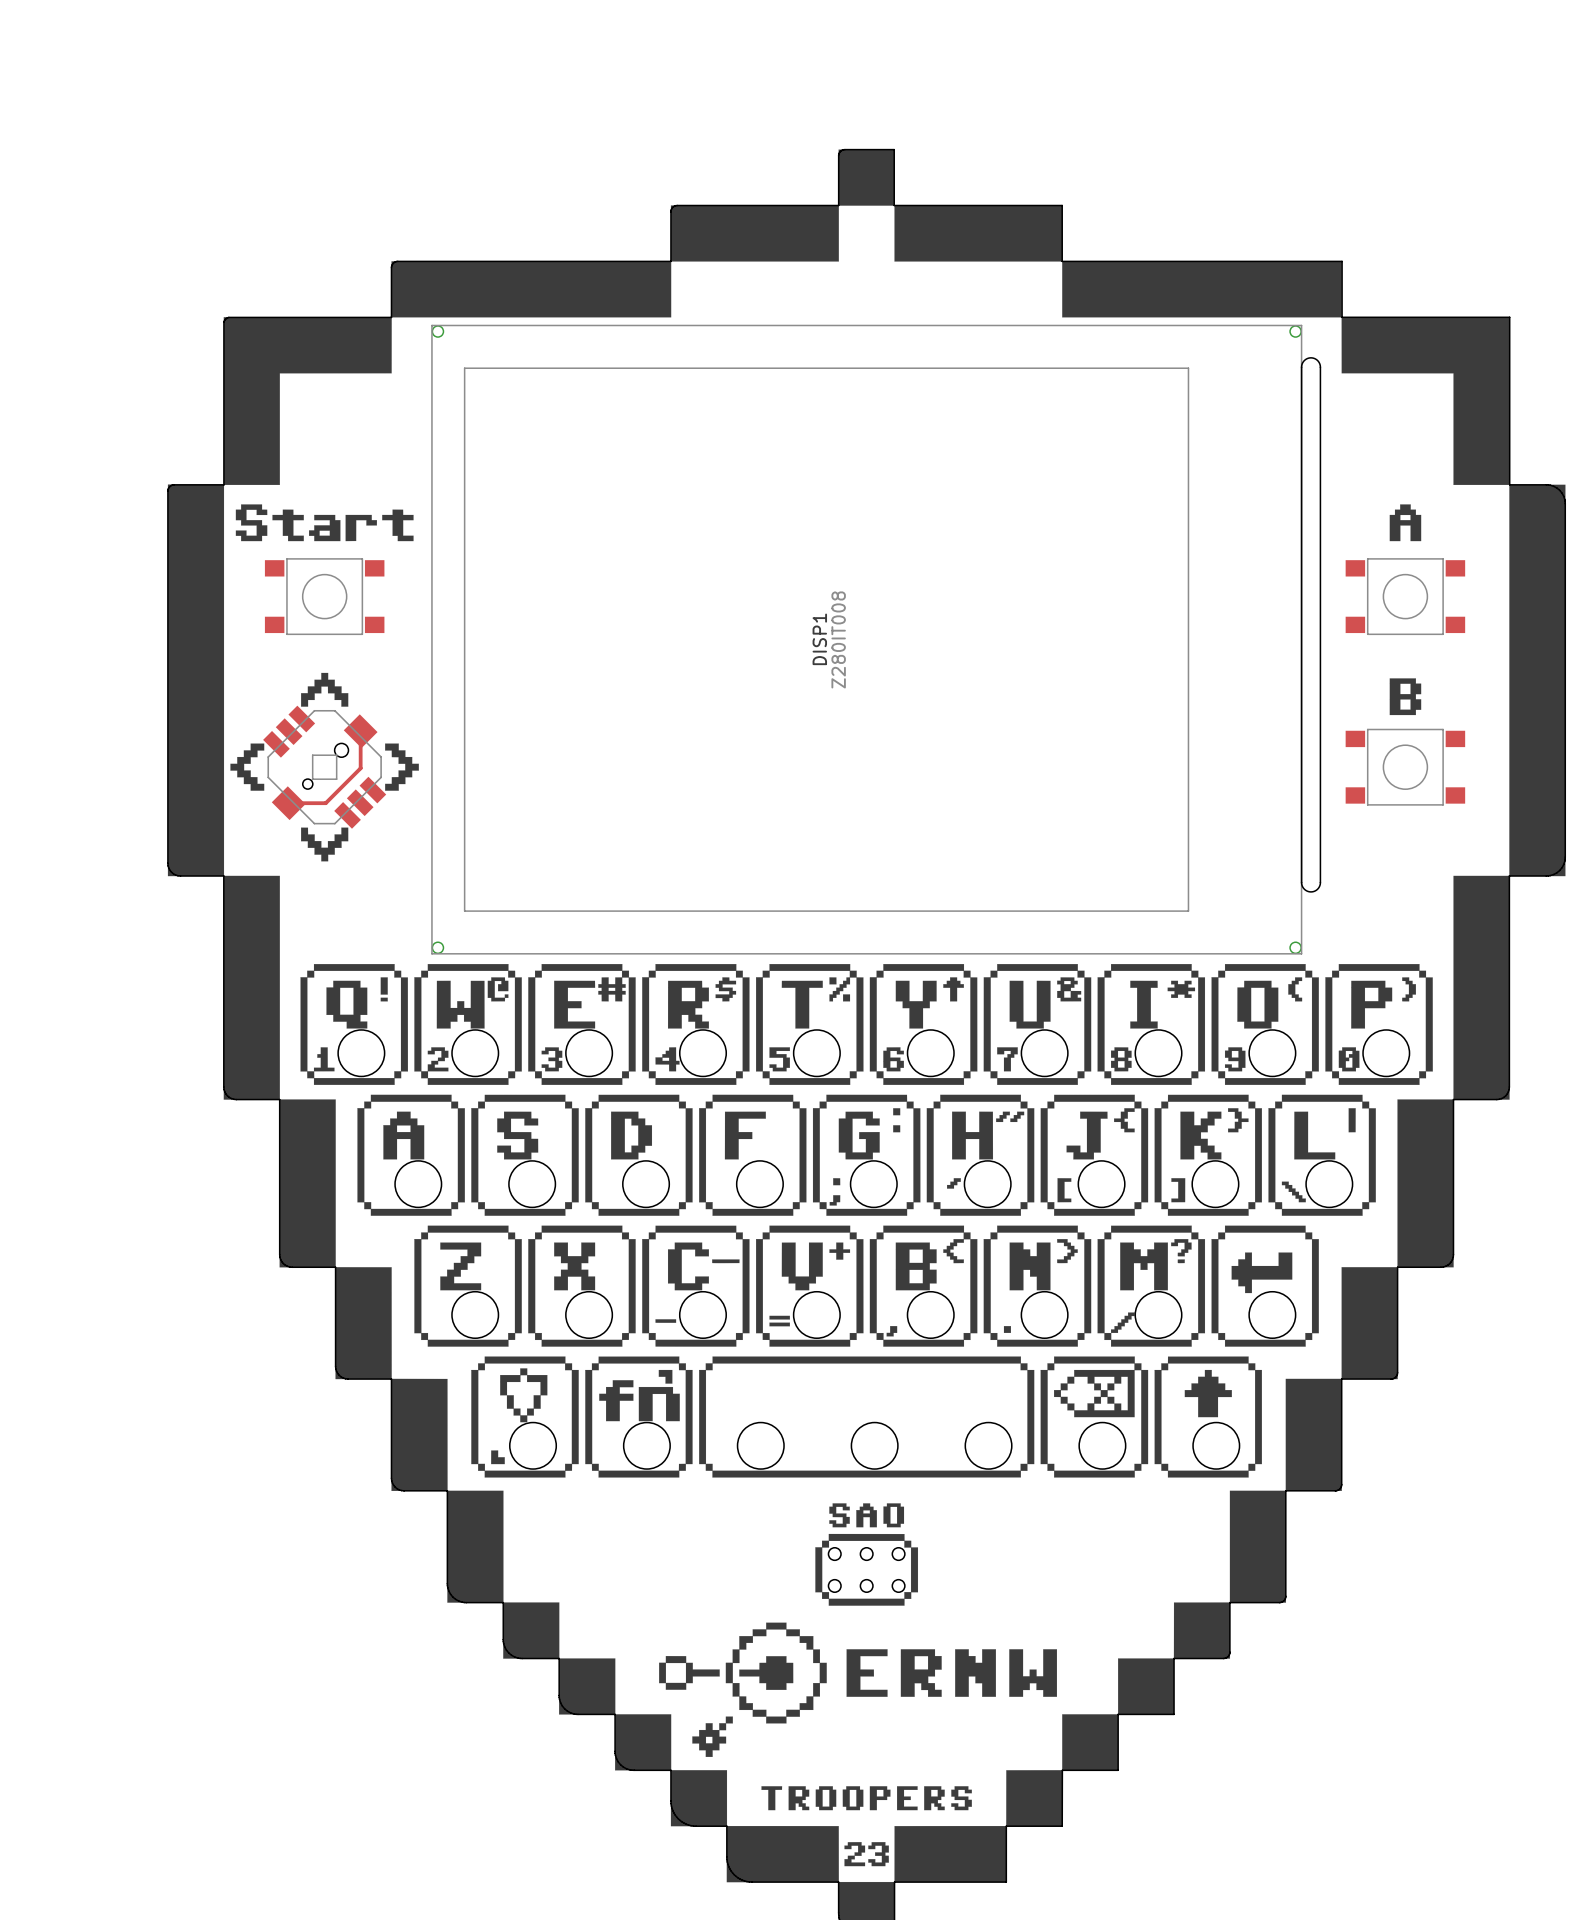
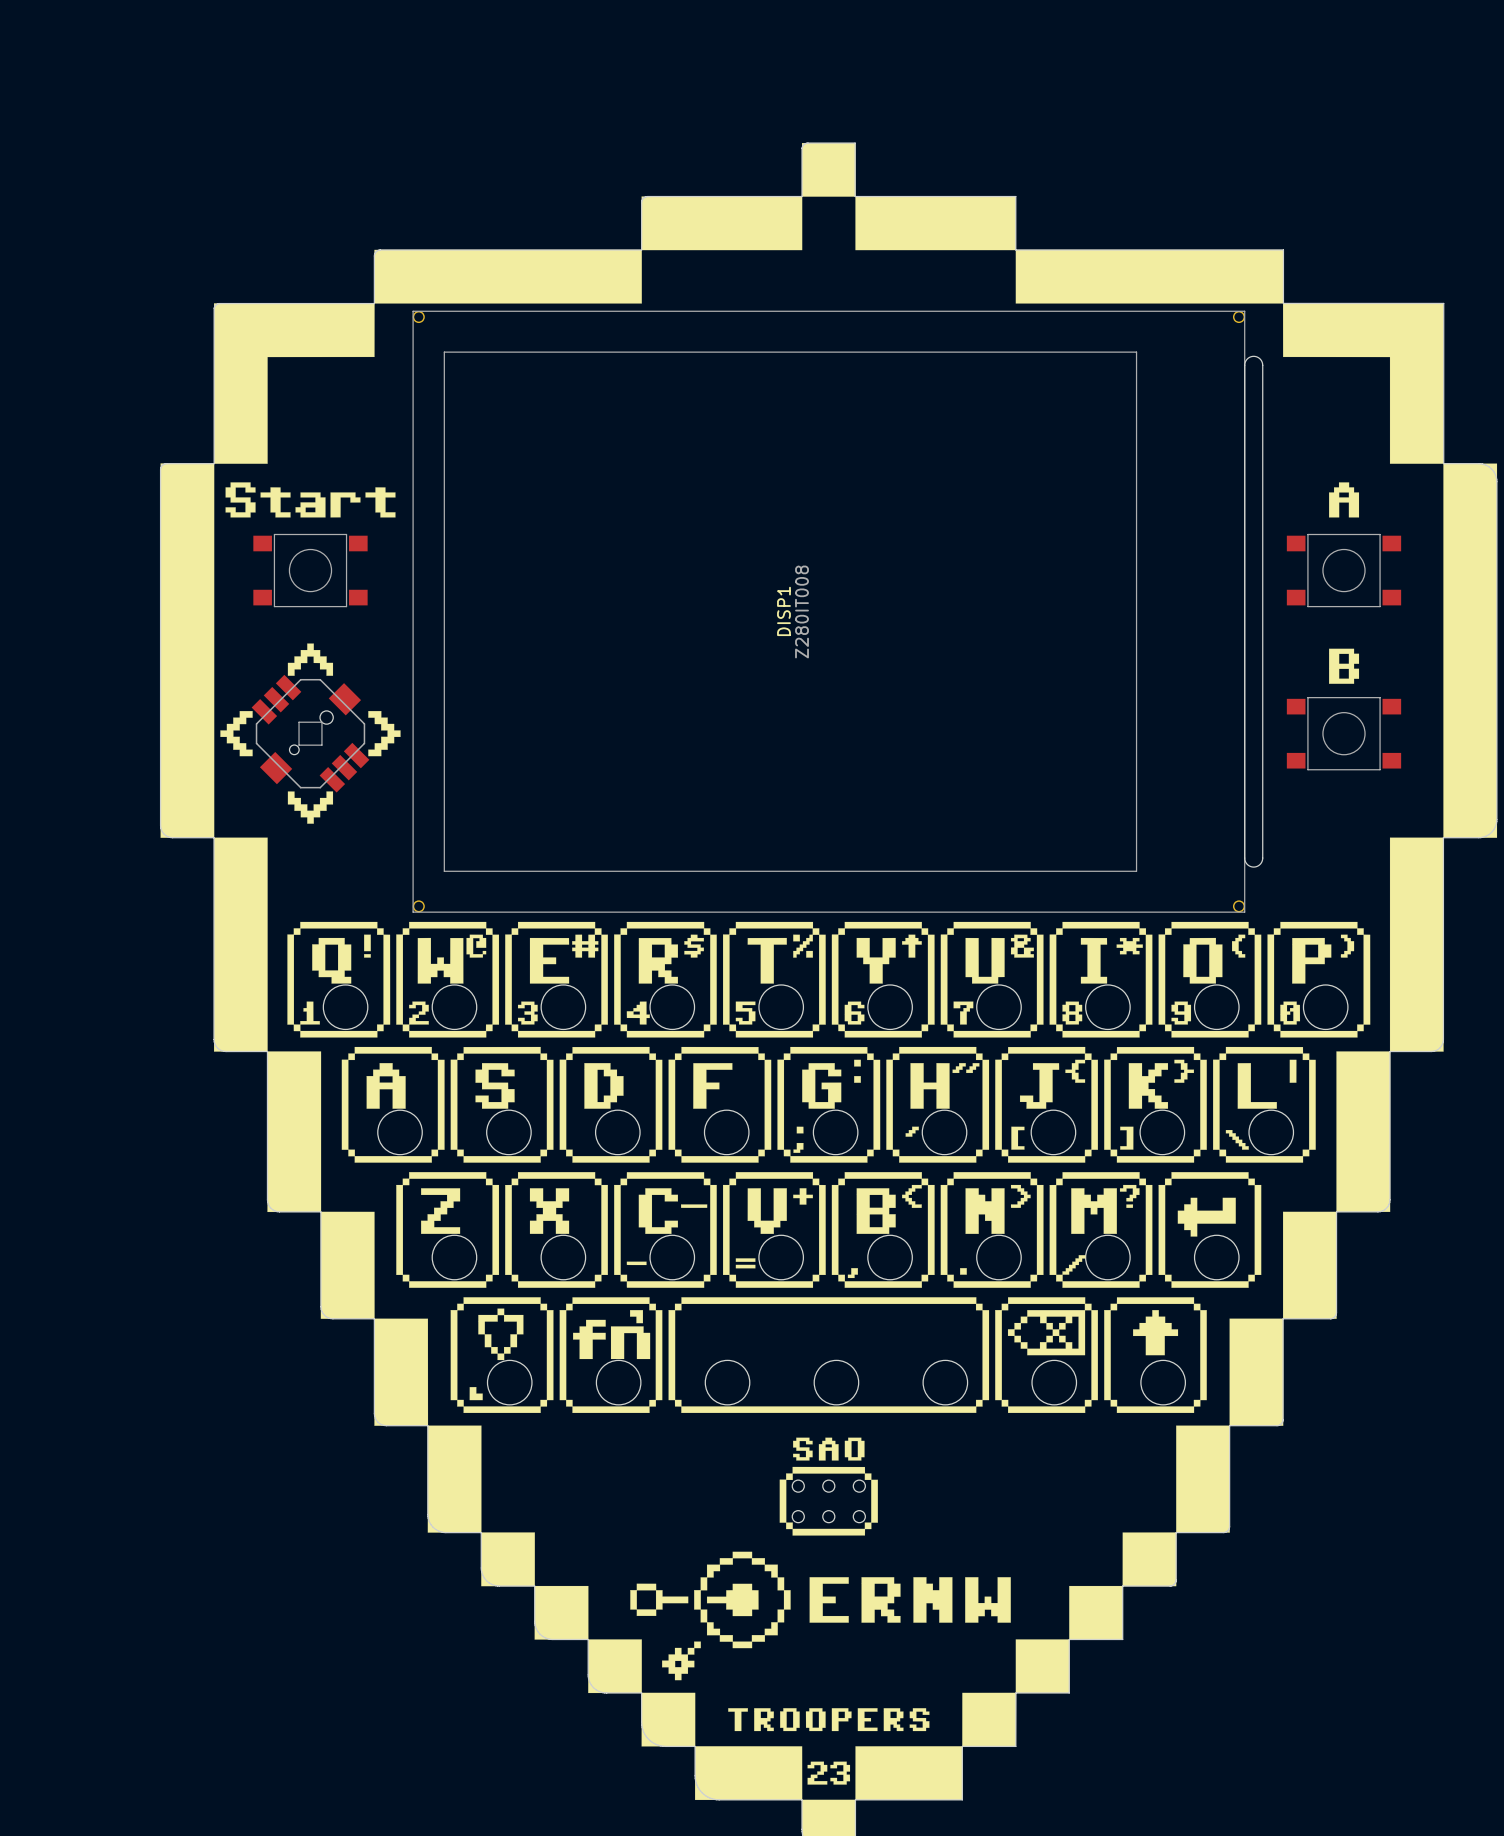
DISP1 footprint: [431, 324, 1322, 955] -> [412, 310, 1264, 913]
track: (360, 731) (360, 768) (325, 803) (288, 803) -> none

